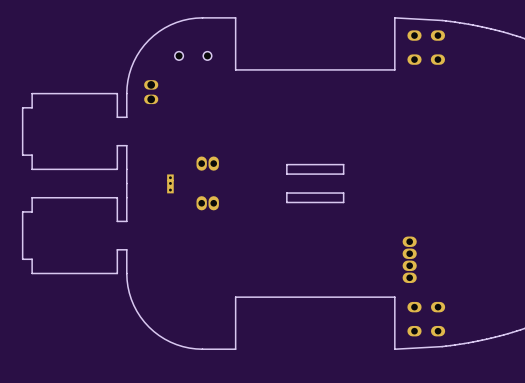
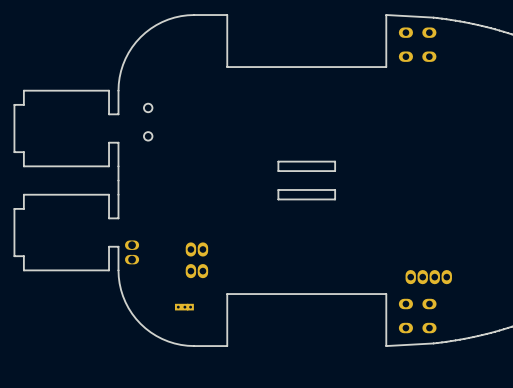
part rotation: 0° (193, 55) -> 90° clockwise (148, 122)
part position: (193, 55) -> (148, 122)
part position: (151, 92) -> (132, 252)
part: (207, 163) -> none
part rotation: 0° (170, 183) -> 90° clockwise (184, 307)
part position: (170, 183) -> (184, 307)
part: (207, 203) -> none
part: none -> (196, 249)
part rotation: 0° (409, 259) -> 90° clockwise (428, 277)
part position: (409, 259) -> (428, 277)
part: none -> (196, 271)

